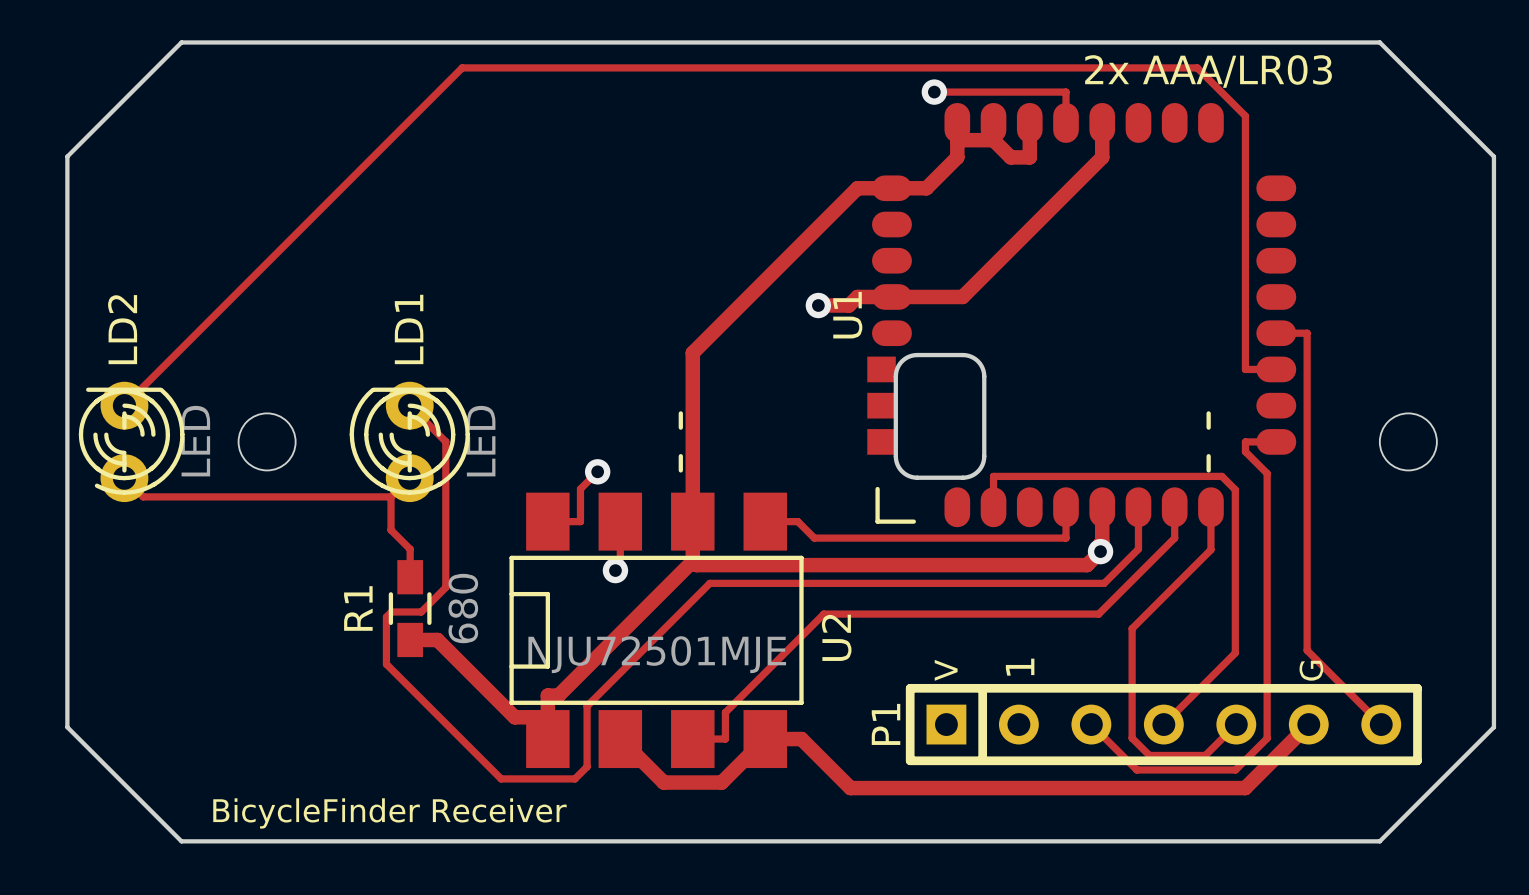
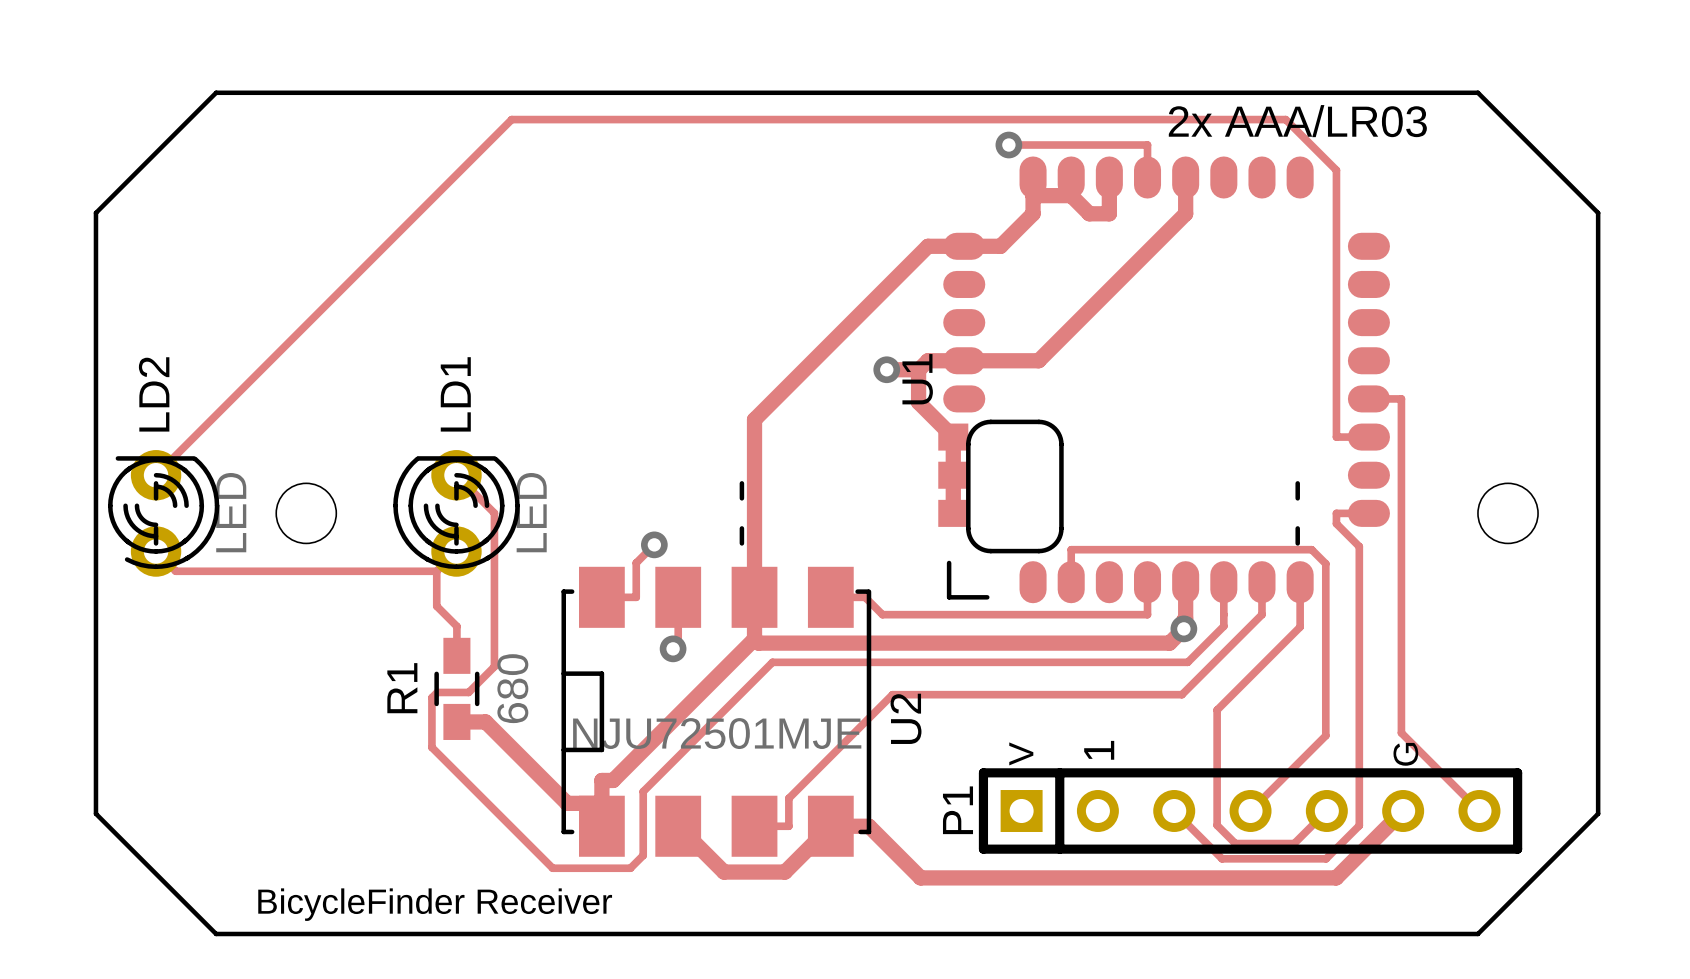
track: none -> (918, 369) (918, 402) (953, 437) (953, 513)
U2 footprint: [509, 492, 804, 769] -> [561, 566, 872, 857]

